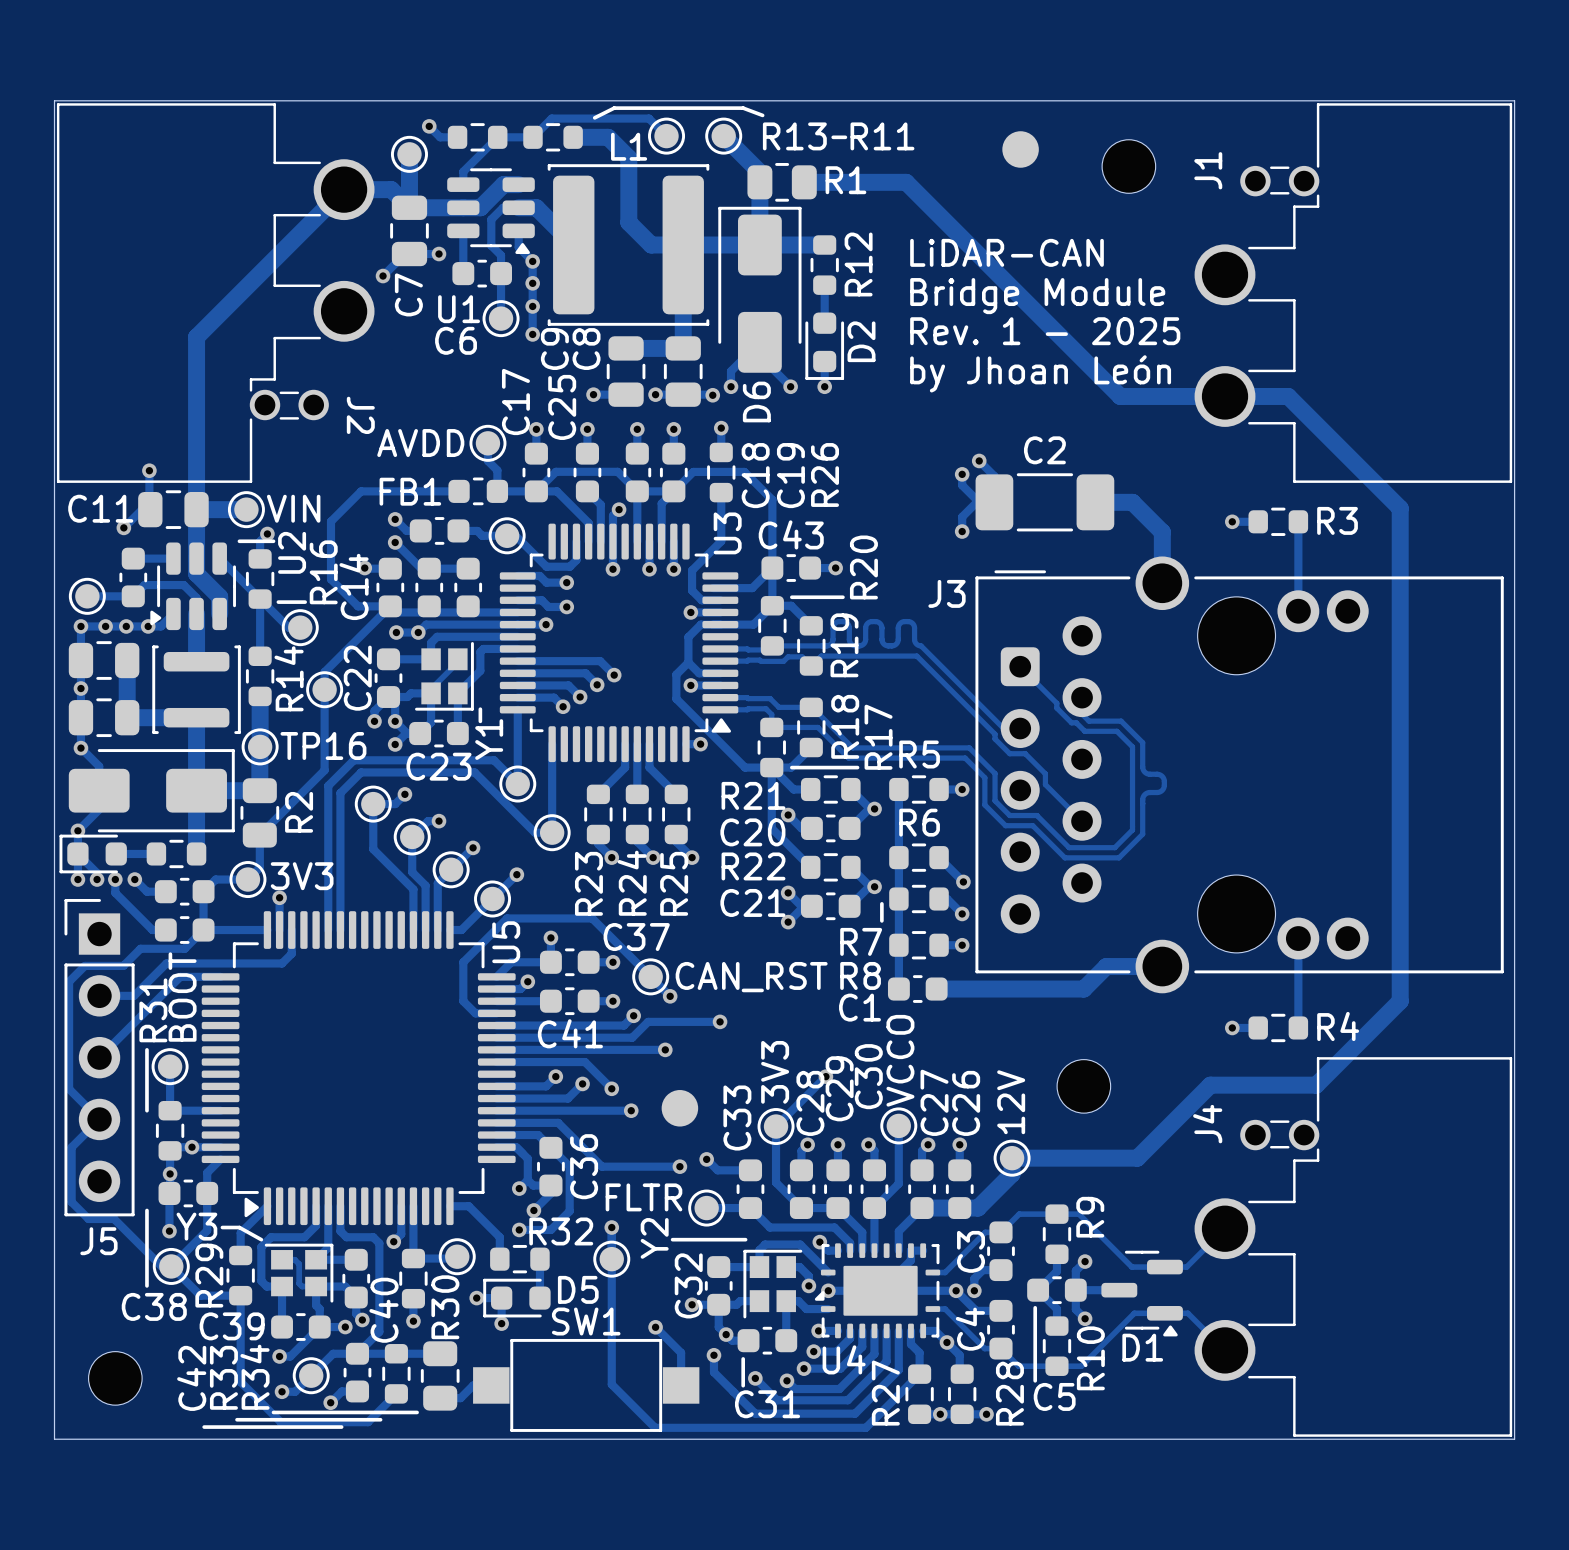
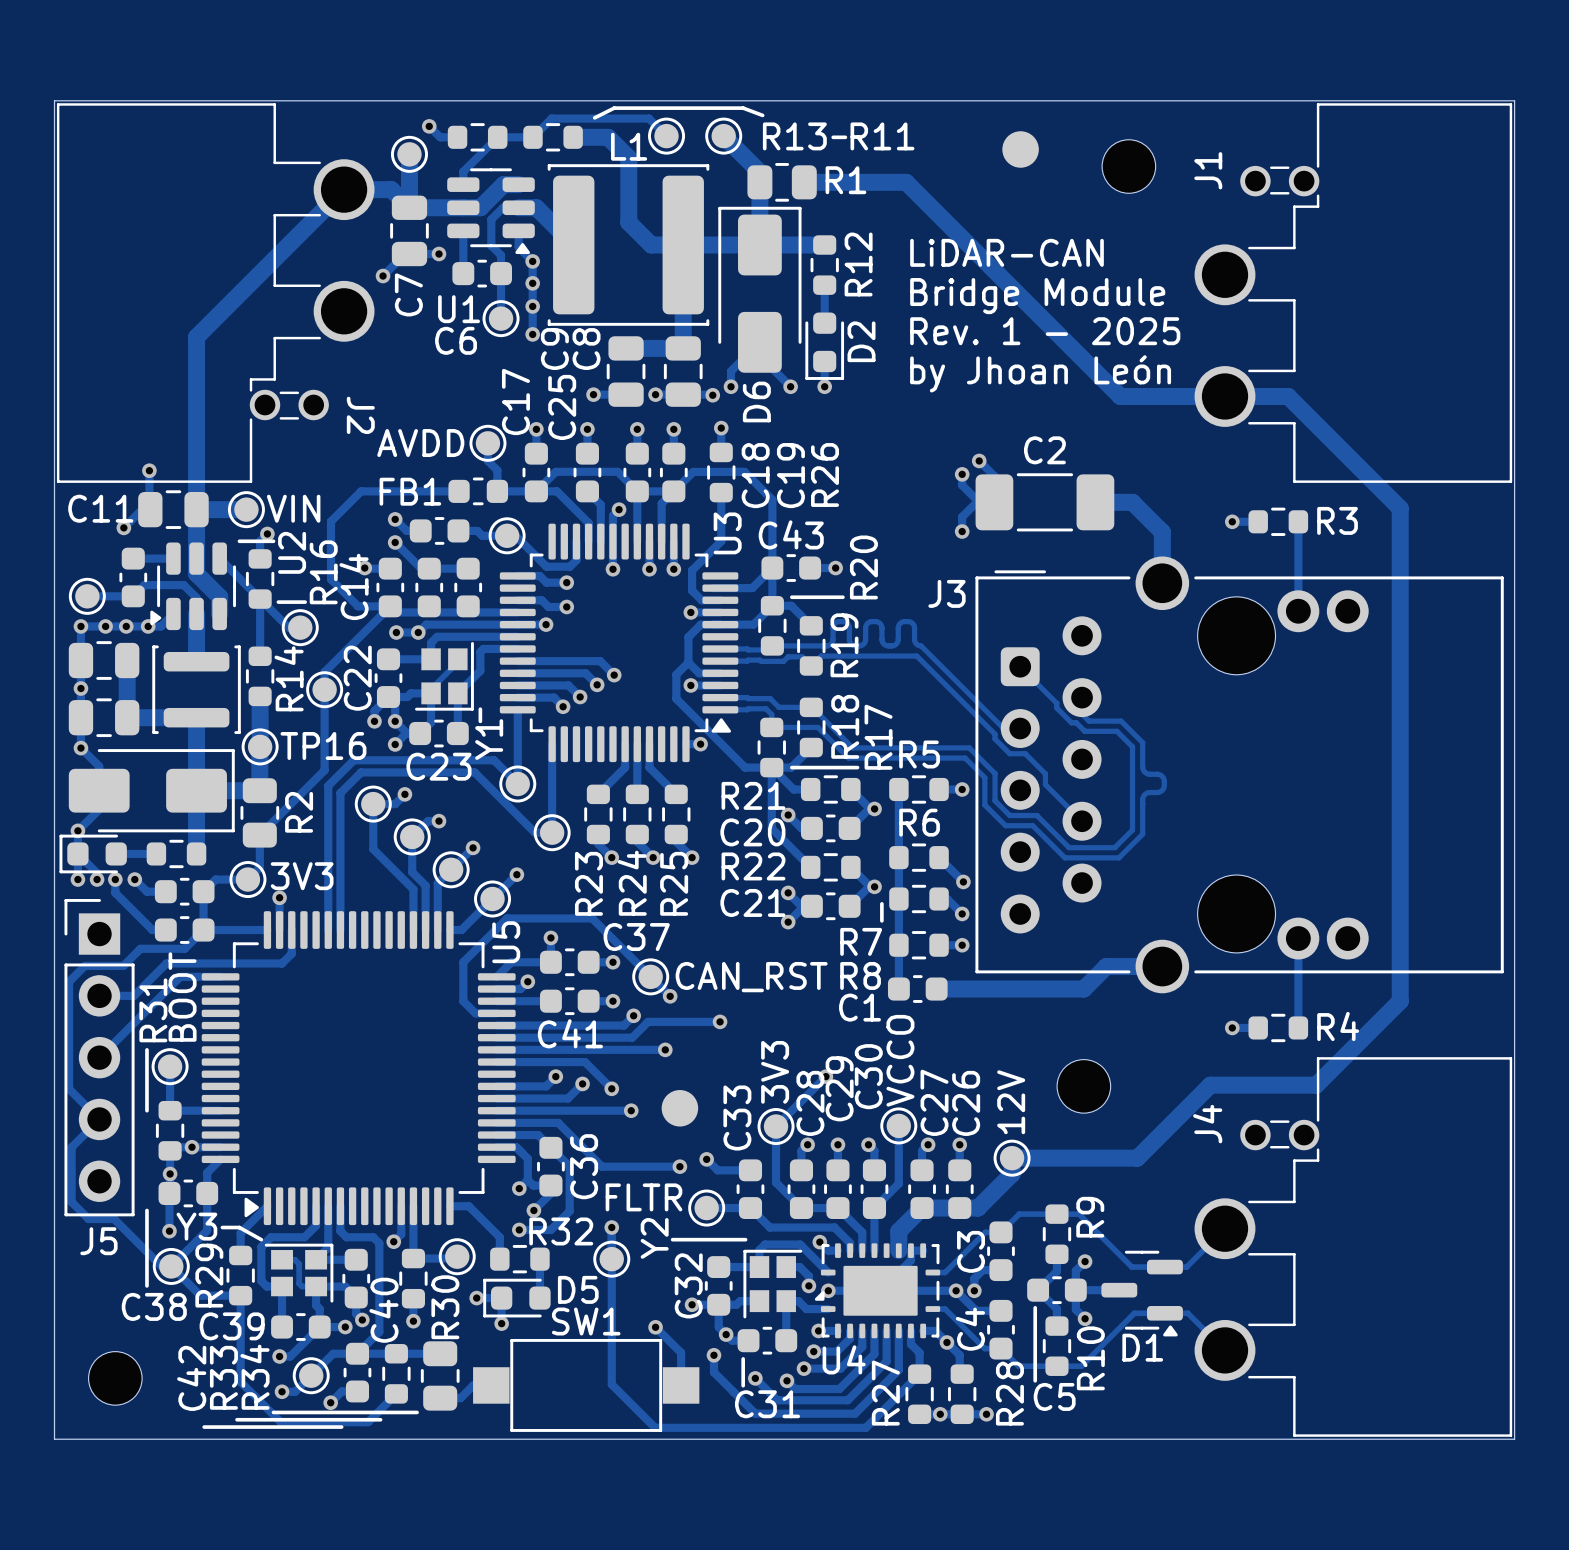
track width: thin (922, 1208) (898, 1231) (898, 1250) -> thick (922, 1208) (898, 1231) (898, 1250)

